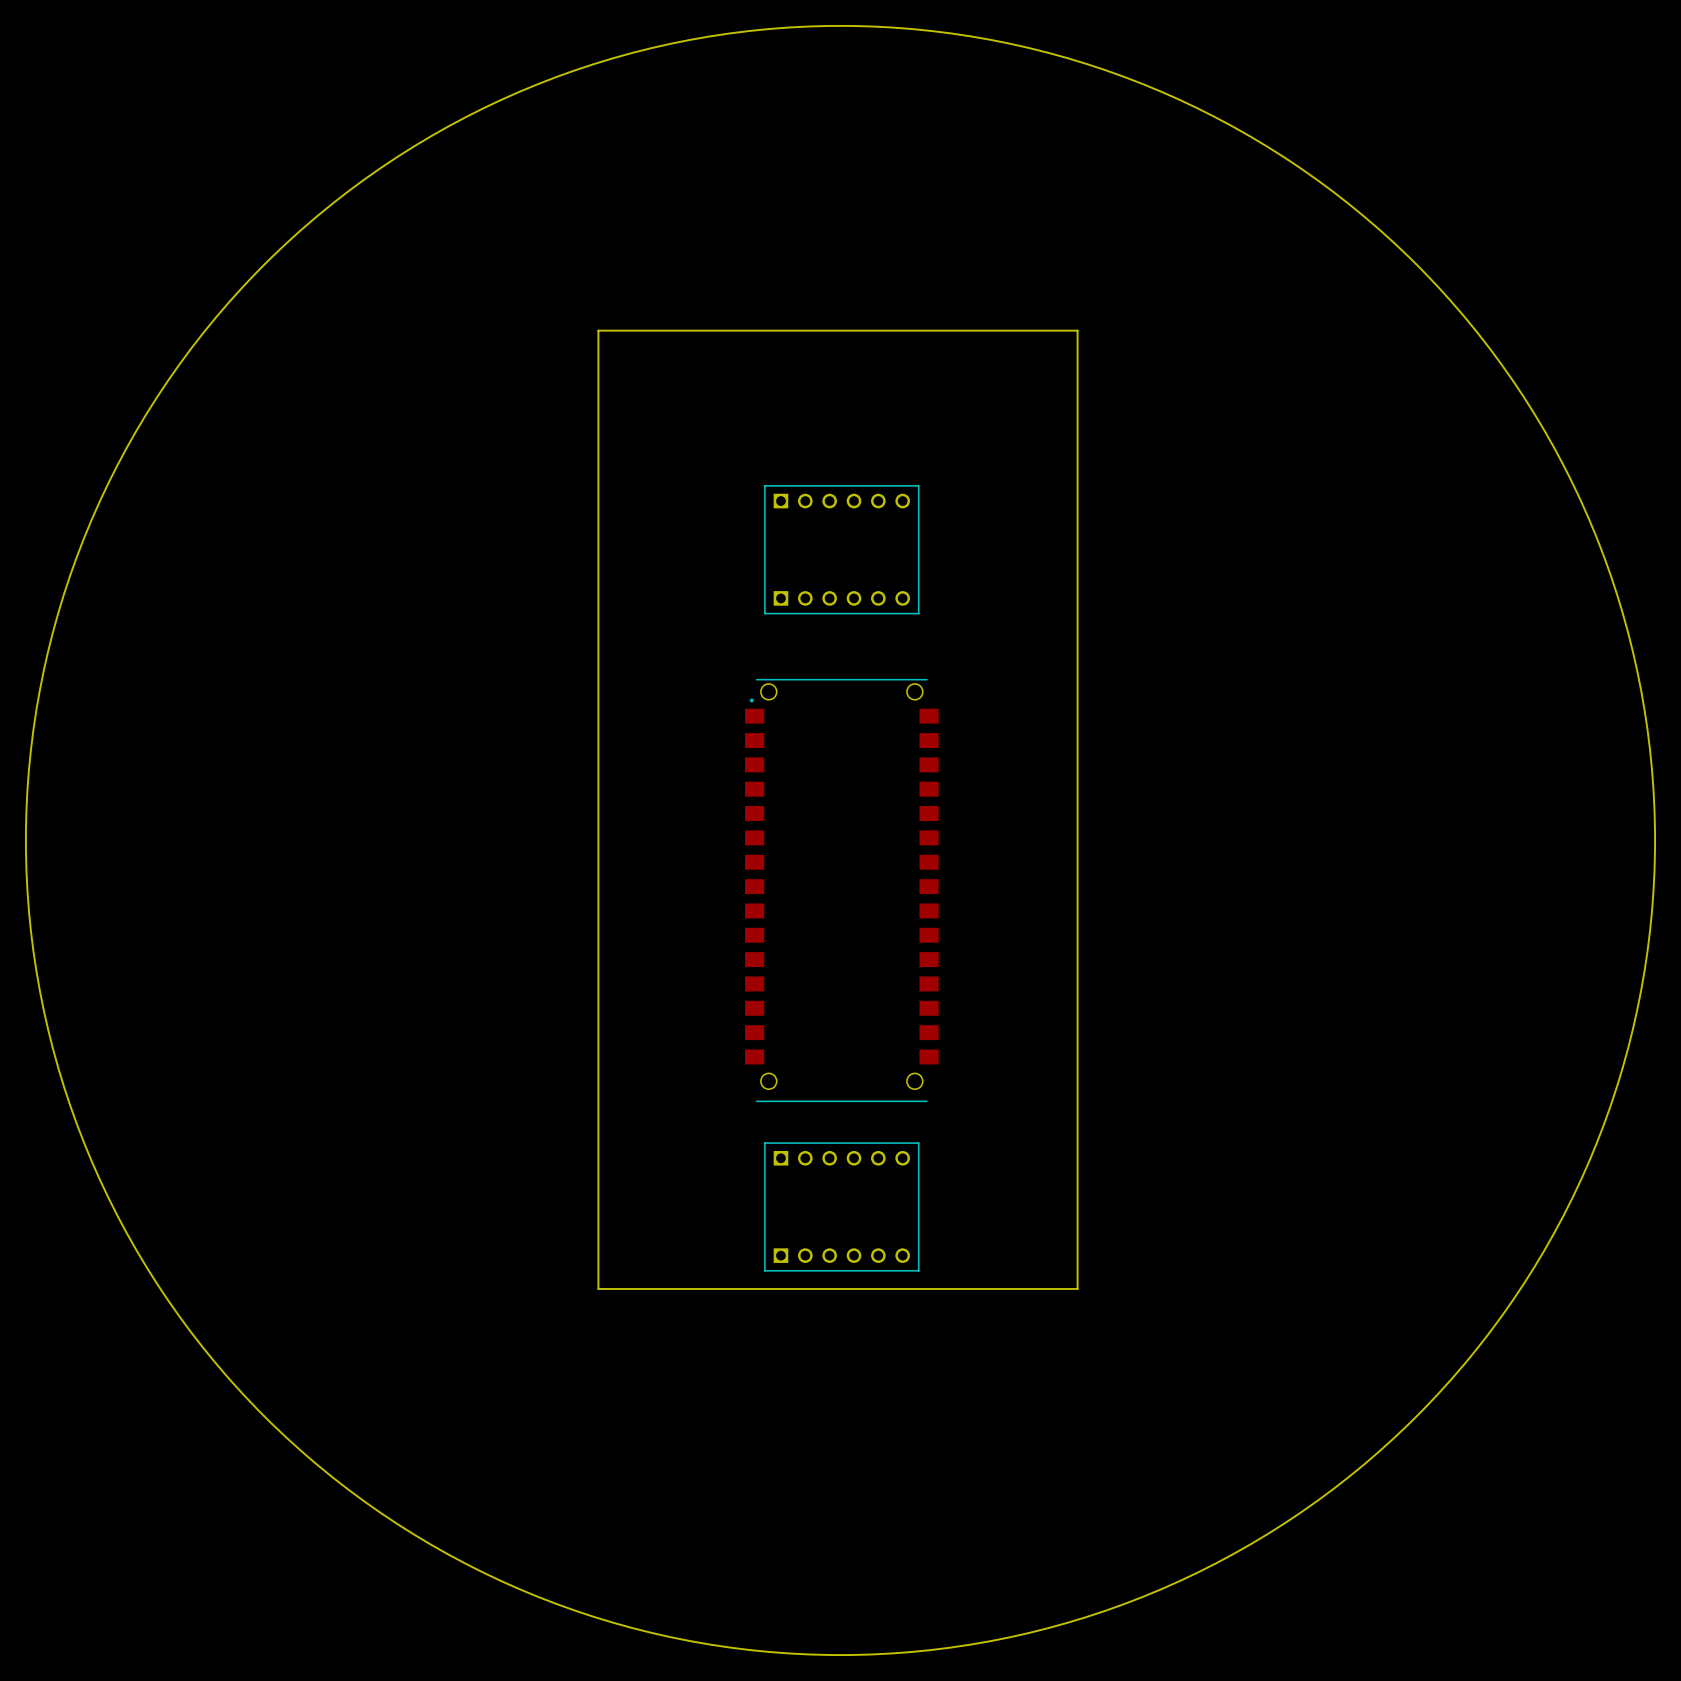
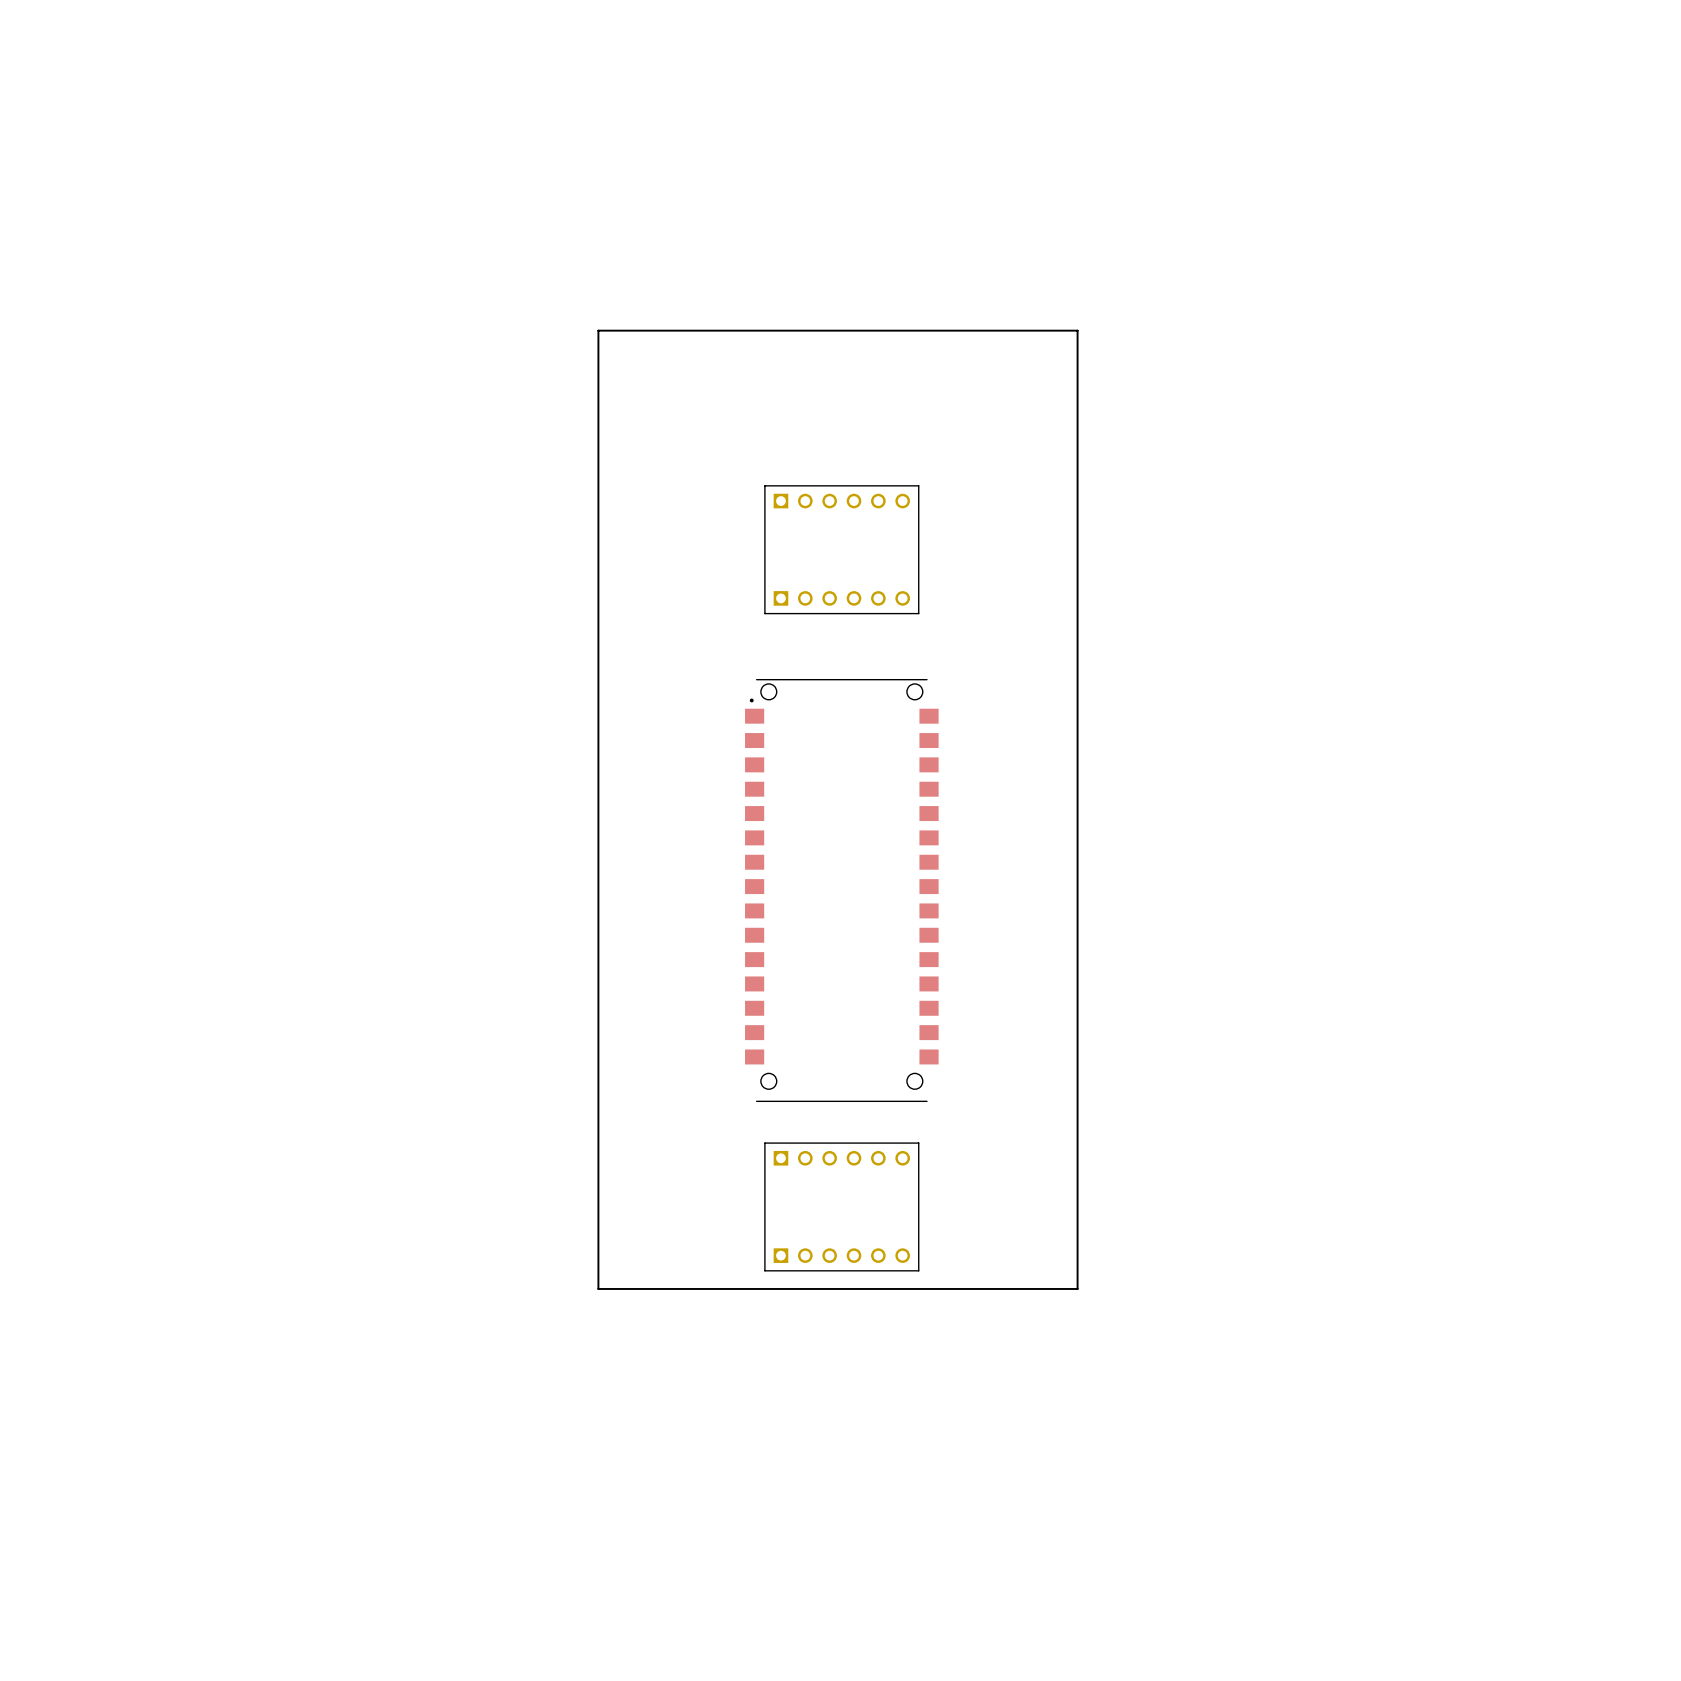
round board edge: [24, 24, 1657, 1657] -> none

